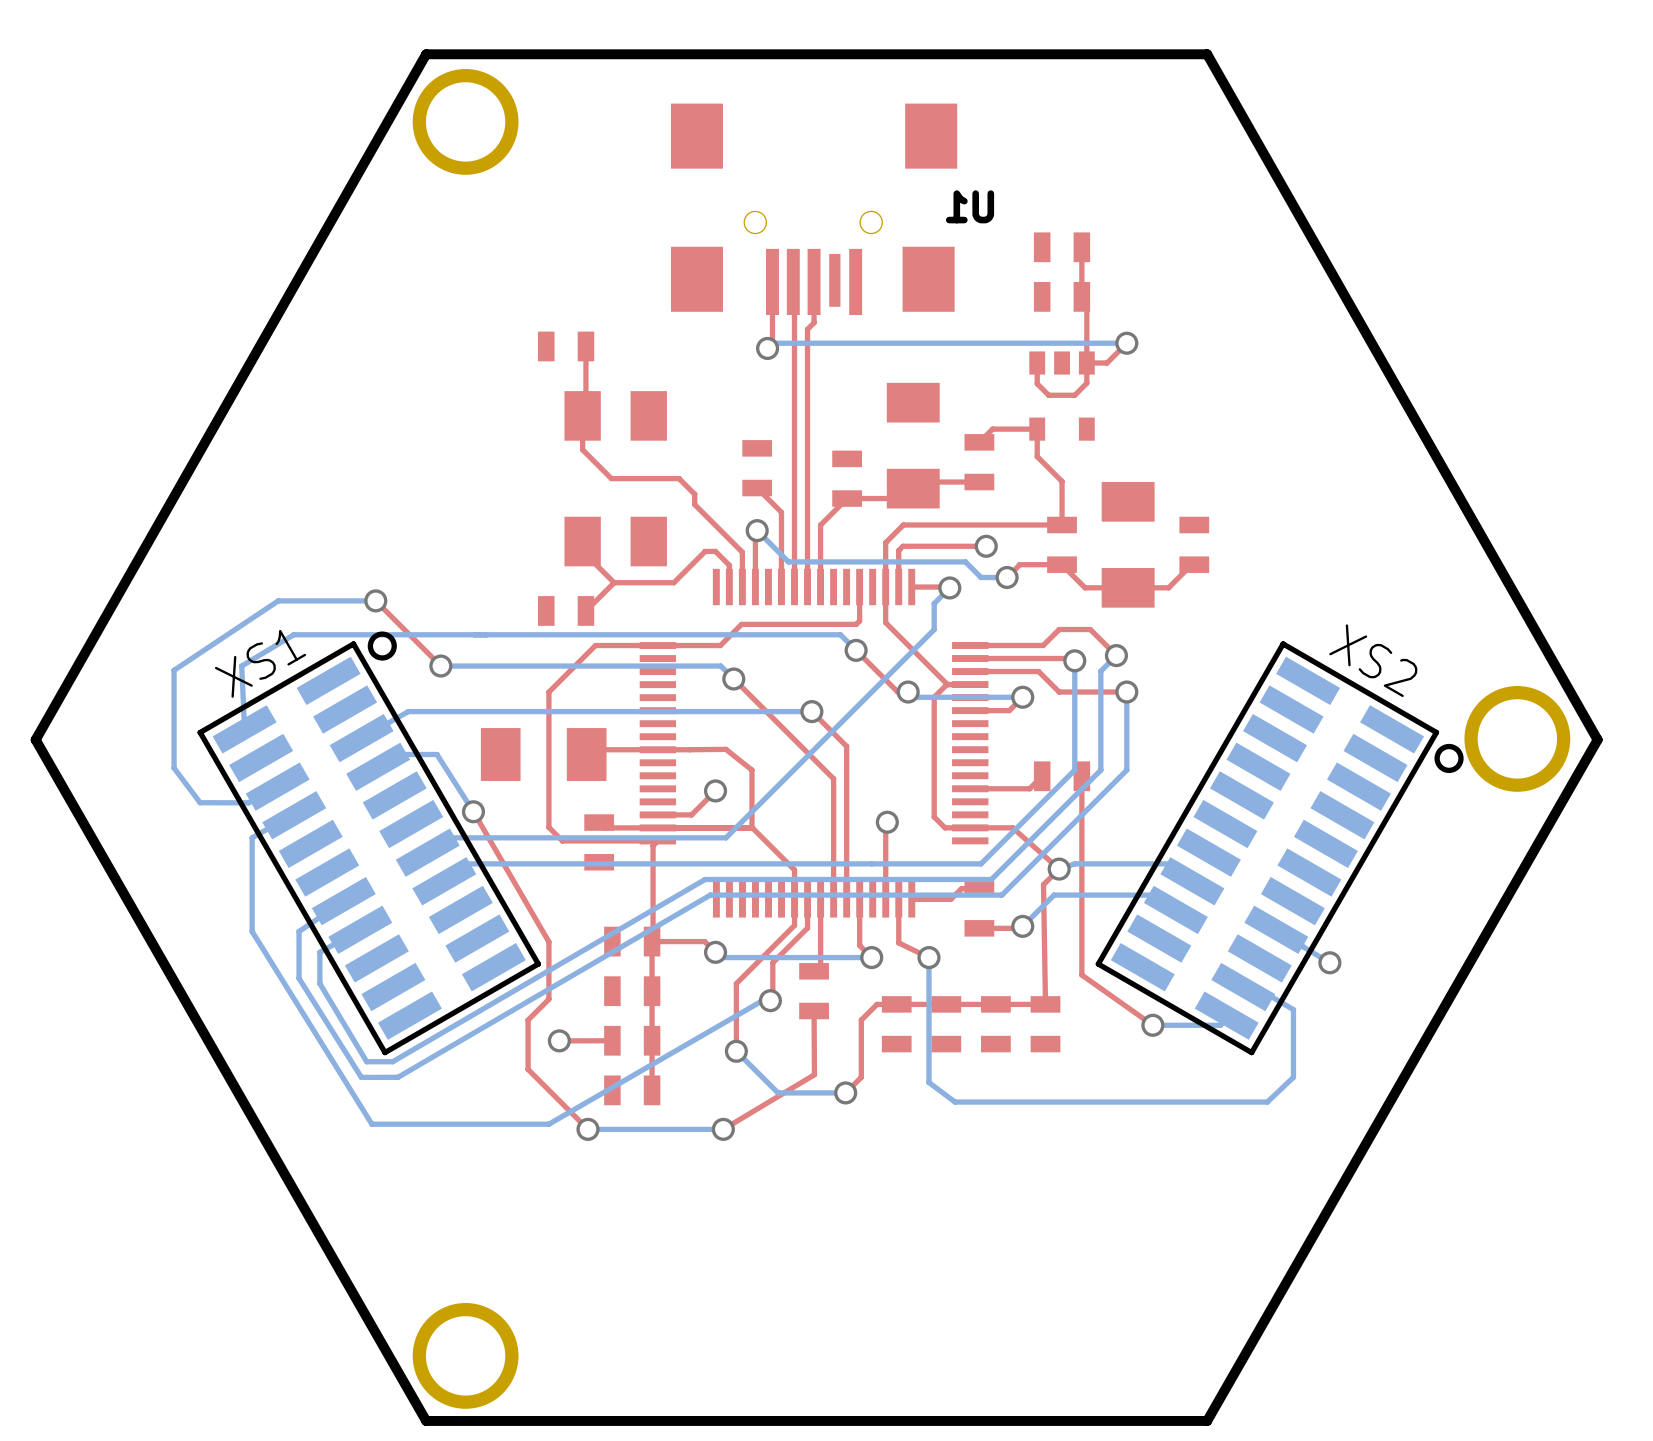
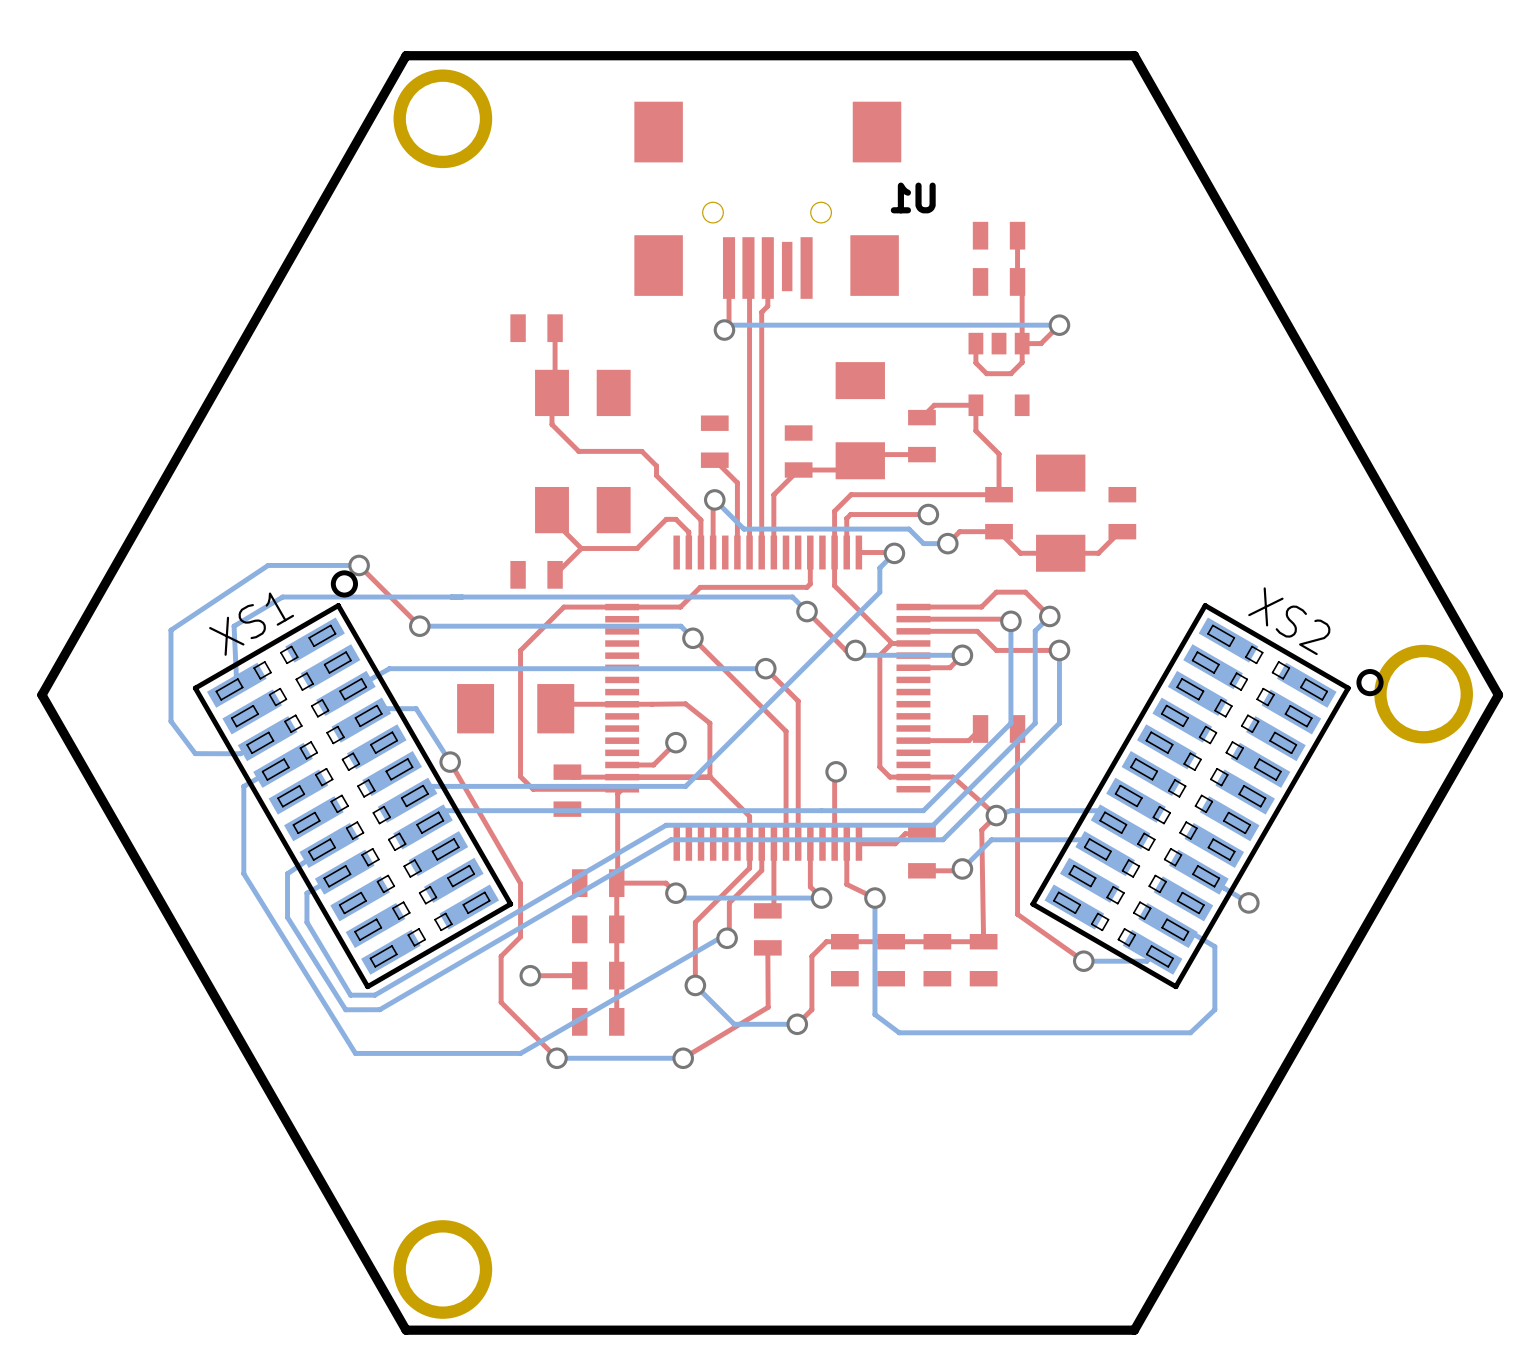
XS1 footprint: [197, 631, 541, 1056] -> [192, 570, 514, 990]
XS2 footprint: [1095, 641, 1464, 1056] -> [1030, 603, 1384, 990]

